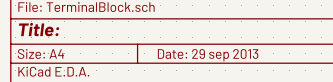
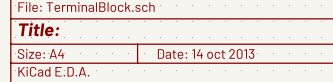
title block: Date: 29 sep 2013 (208, 55) -> Date: 14 oct 2013 (206, 54)

